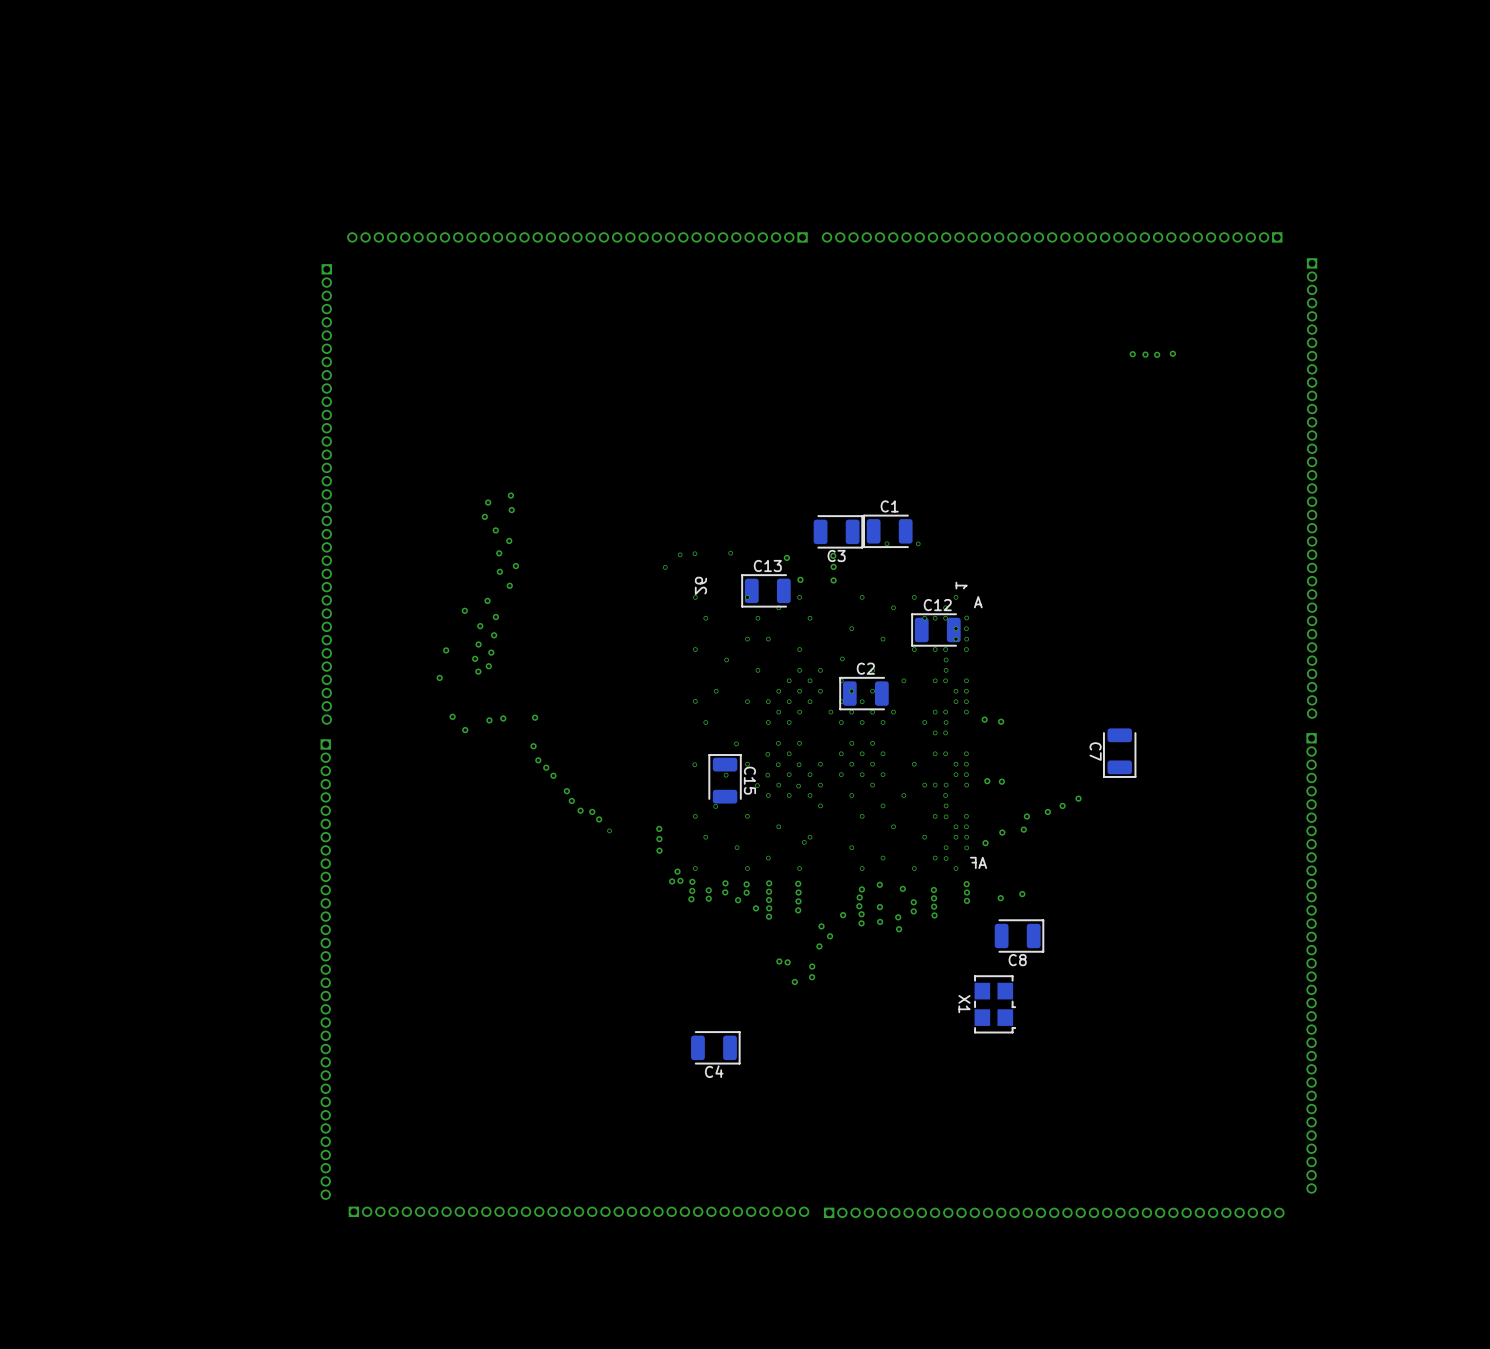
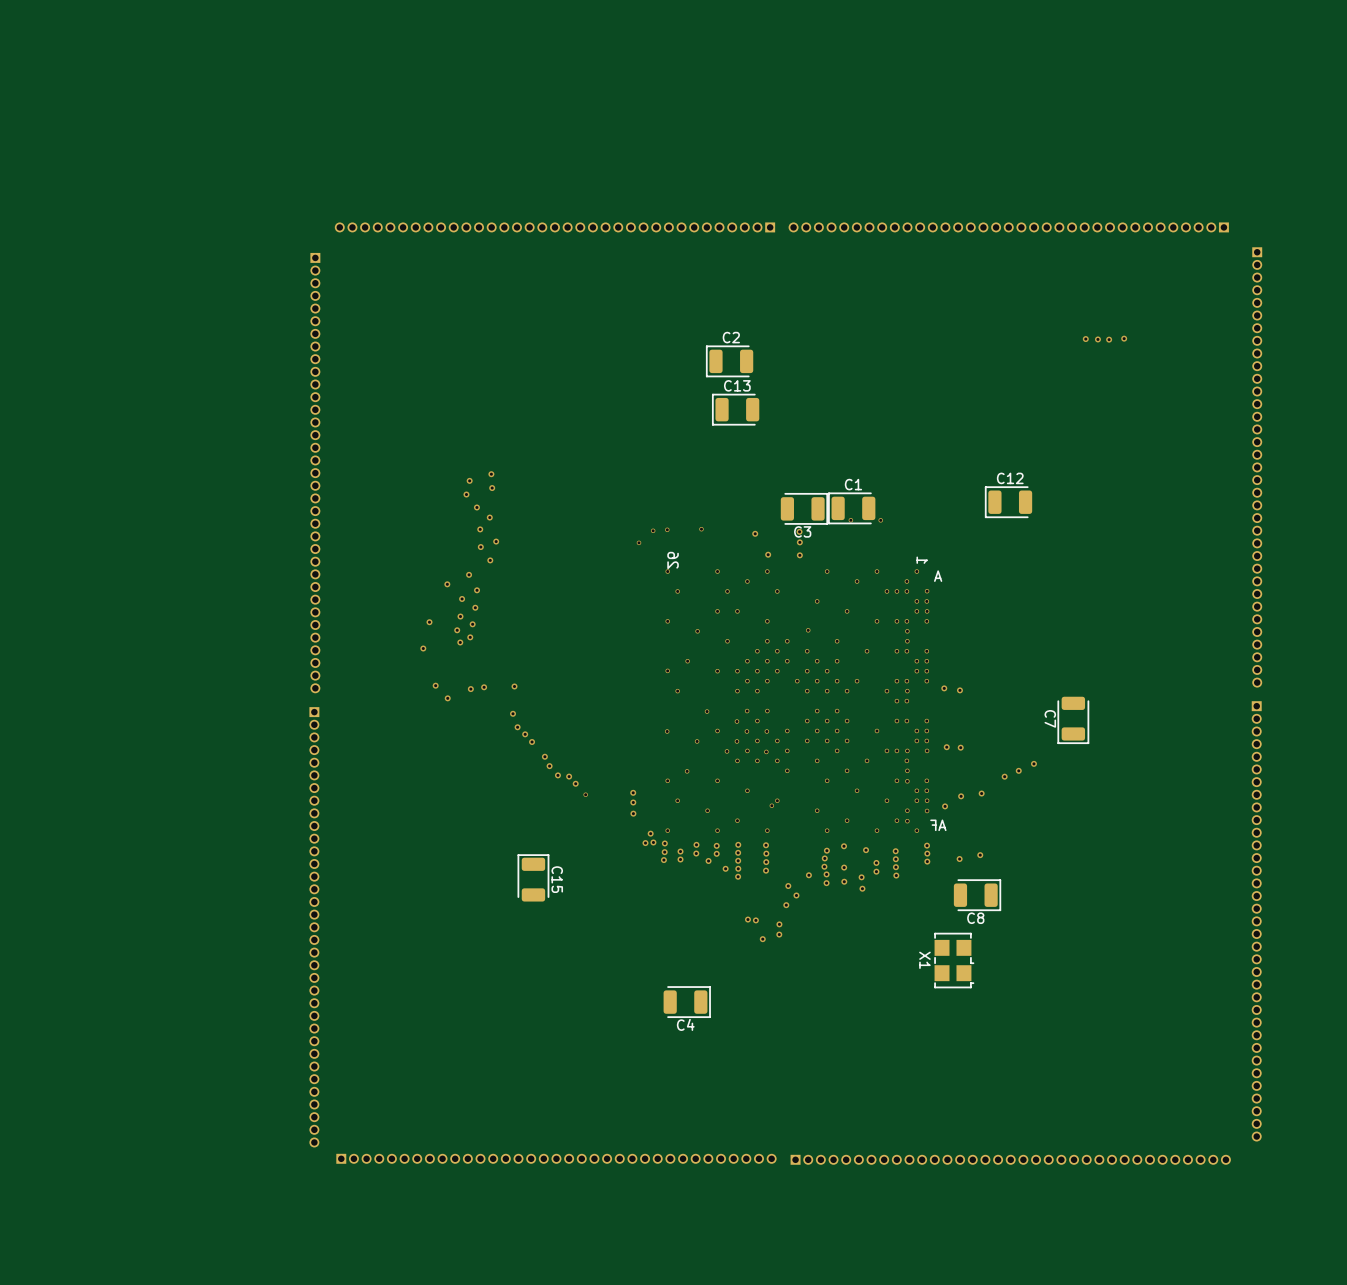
C13 position: (766, 590) -> (735, 409)
C12 position: (936, 629) -> (1008, 502)
C2 position: (864, 693) -> (729, 361)
C15 position: (725, 778) -> (533, 878)
via: (1026, 816) -> none

